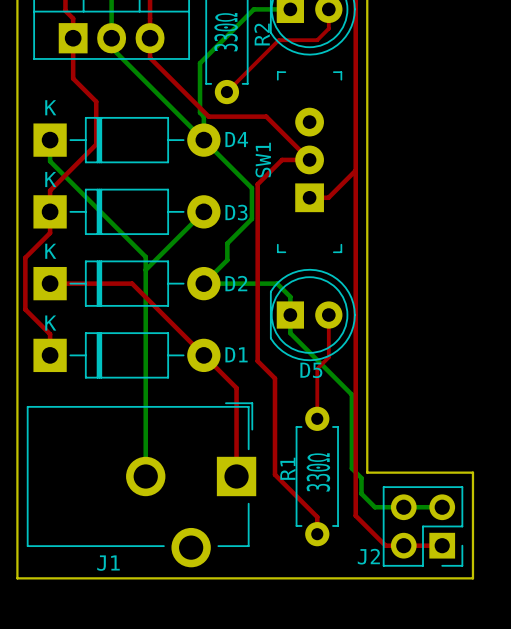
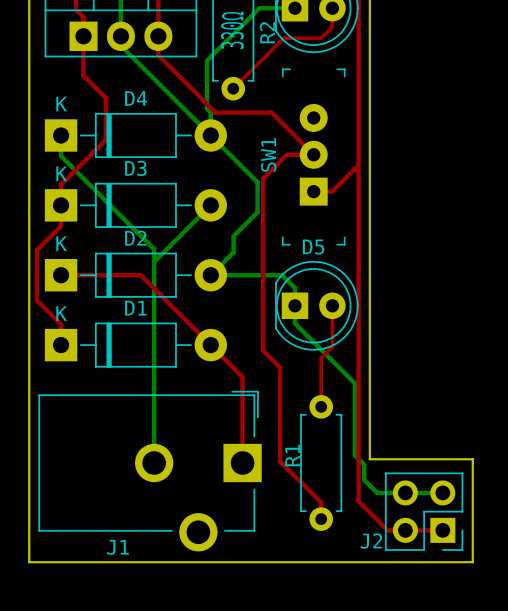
D4 name position: D4 (236, 139) -> D4 (136, 98)
D3 name position: D3 (236, 212) -> D3 (135, 168)
D2 name position: D2 (236, 283) -> D2 (135, 238)
D1 name position: D1 (236, 354) -> D1 (135, 308)
D5 name position: D5 (311, 370) -> D5 (313, 247)
text: 330Ω (318, 472) -> none

